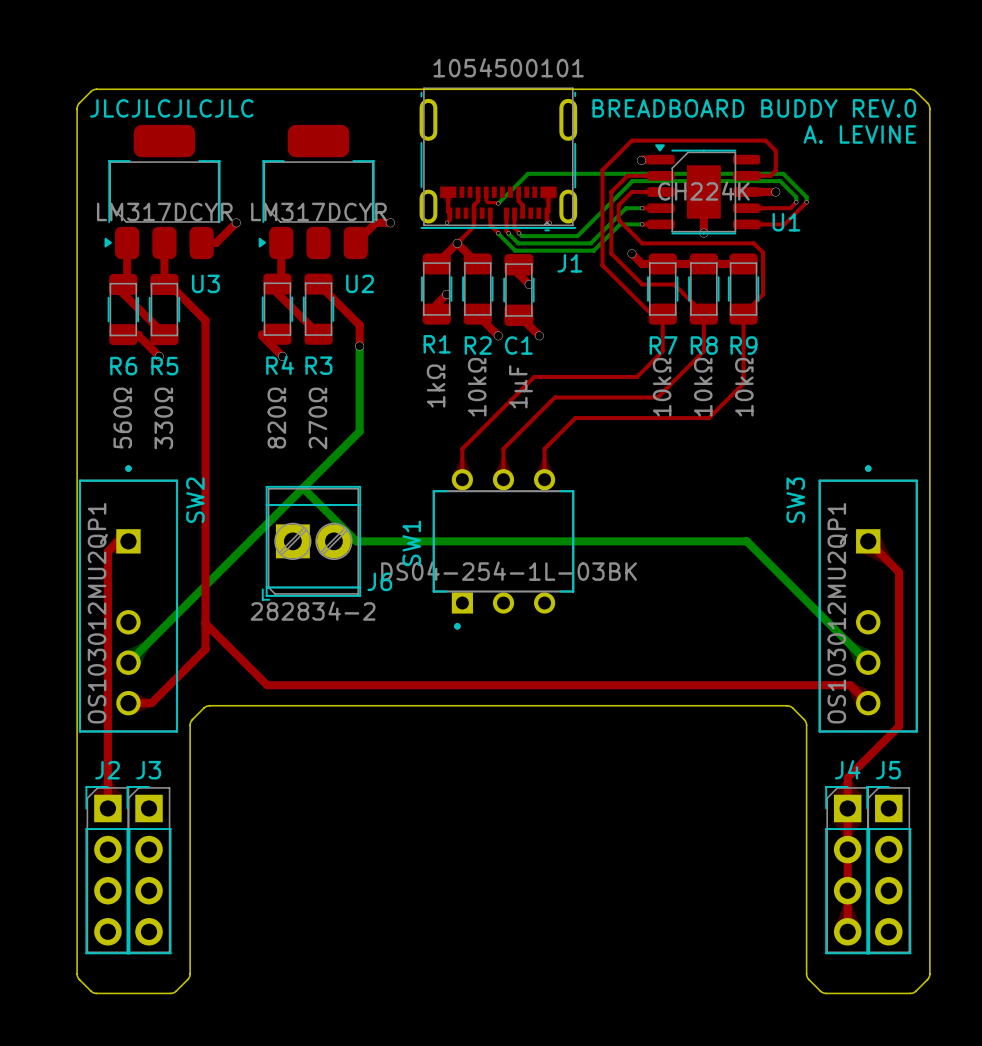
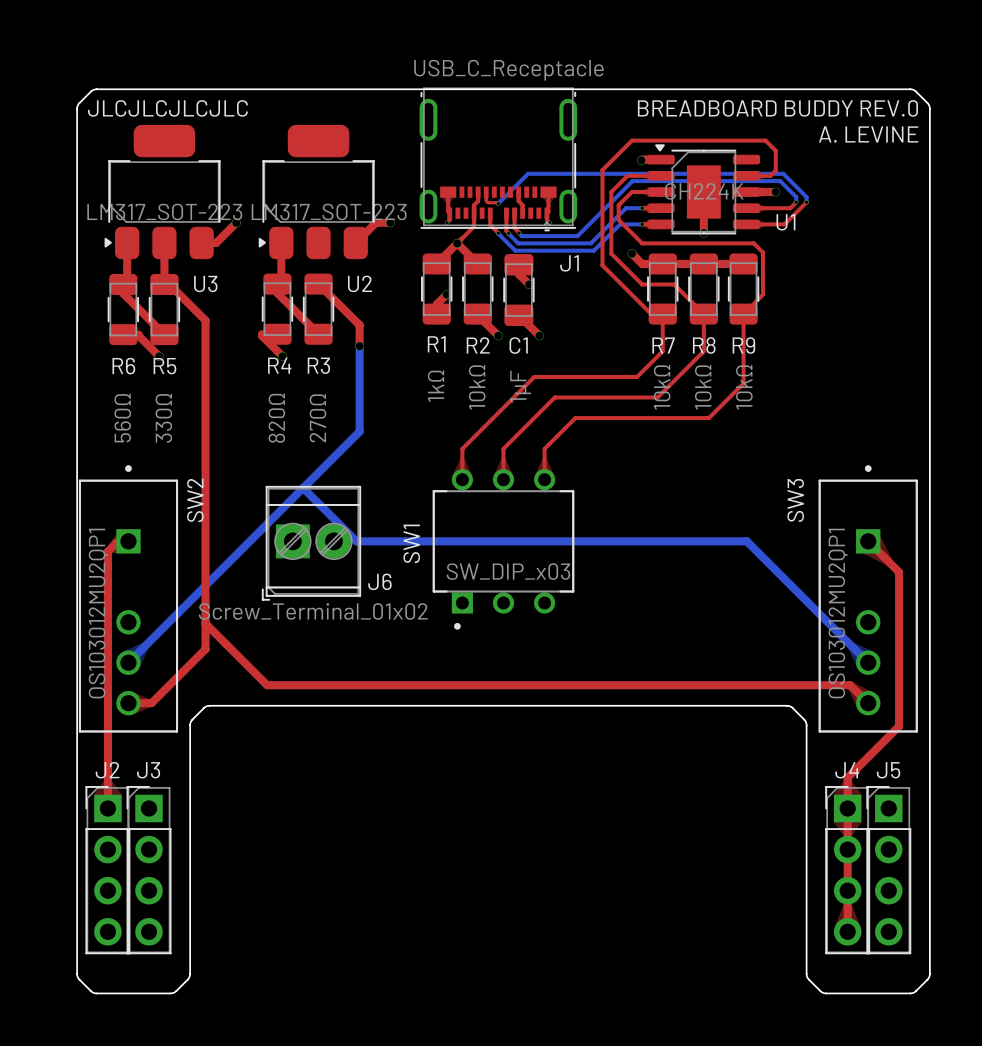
J1 value: 1054500101 (508, 67) -> USB_C_Receptacle (508, 70)
U3 value: LM317DCYR (164, 211) -> LM317_SOT-223 (164, 211)
U2 value: LM317DCYR (318, 211) -> LM317_SOT-223 (329, 211)
SW1 value: DS04-254-1L-03BK (509, 571) -> SW_DIP_x03 (508, 571)
J6 value: 282834-2 (313, 611) -> Screw_Terminal_01x02 (313, 611)

